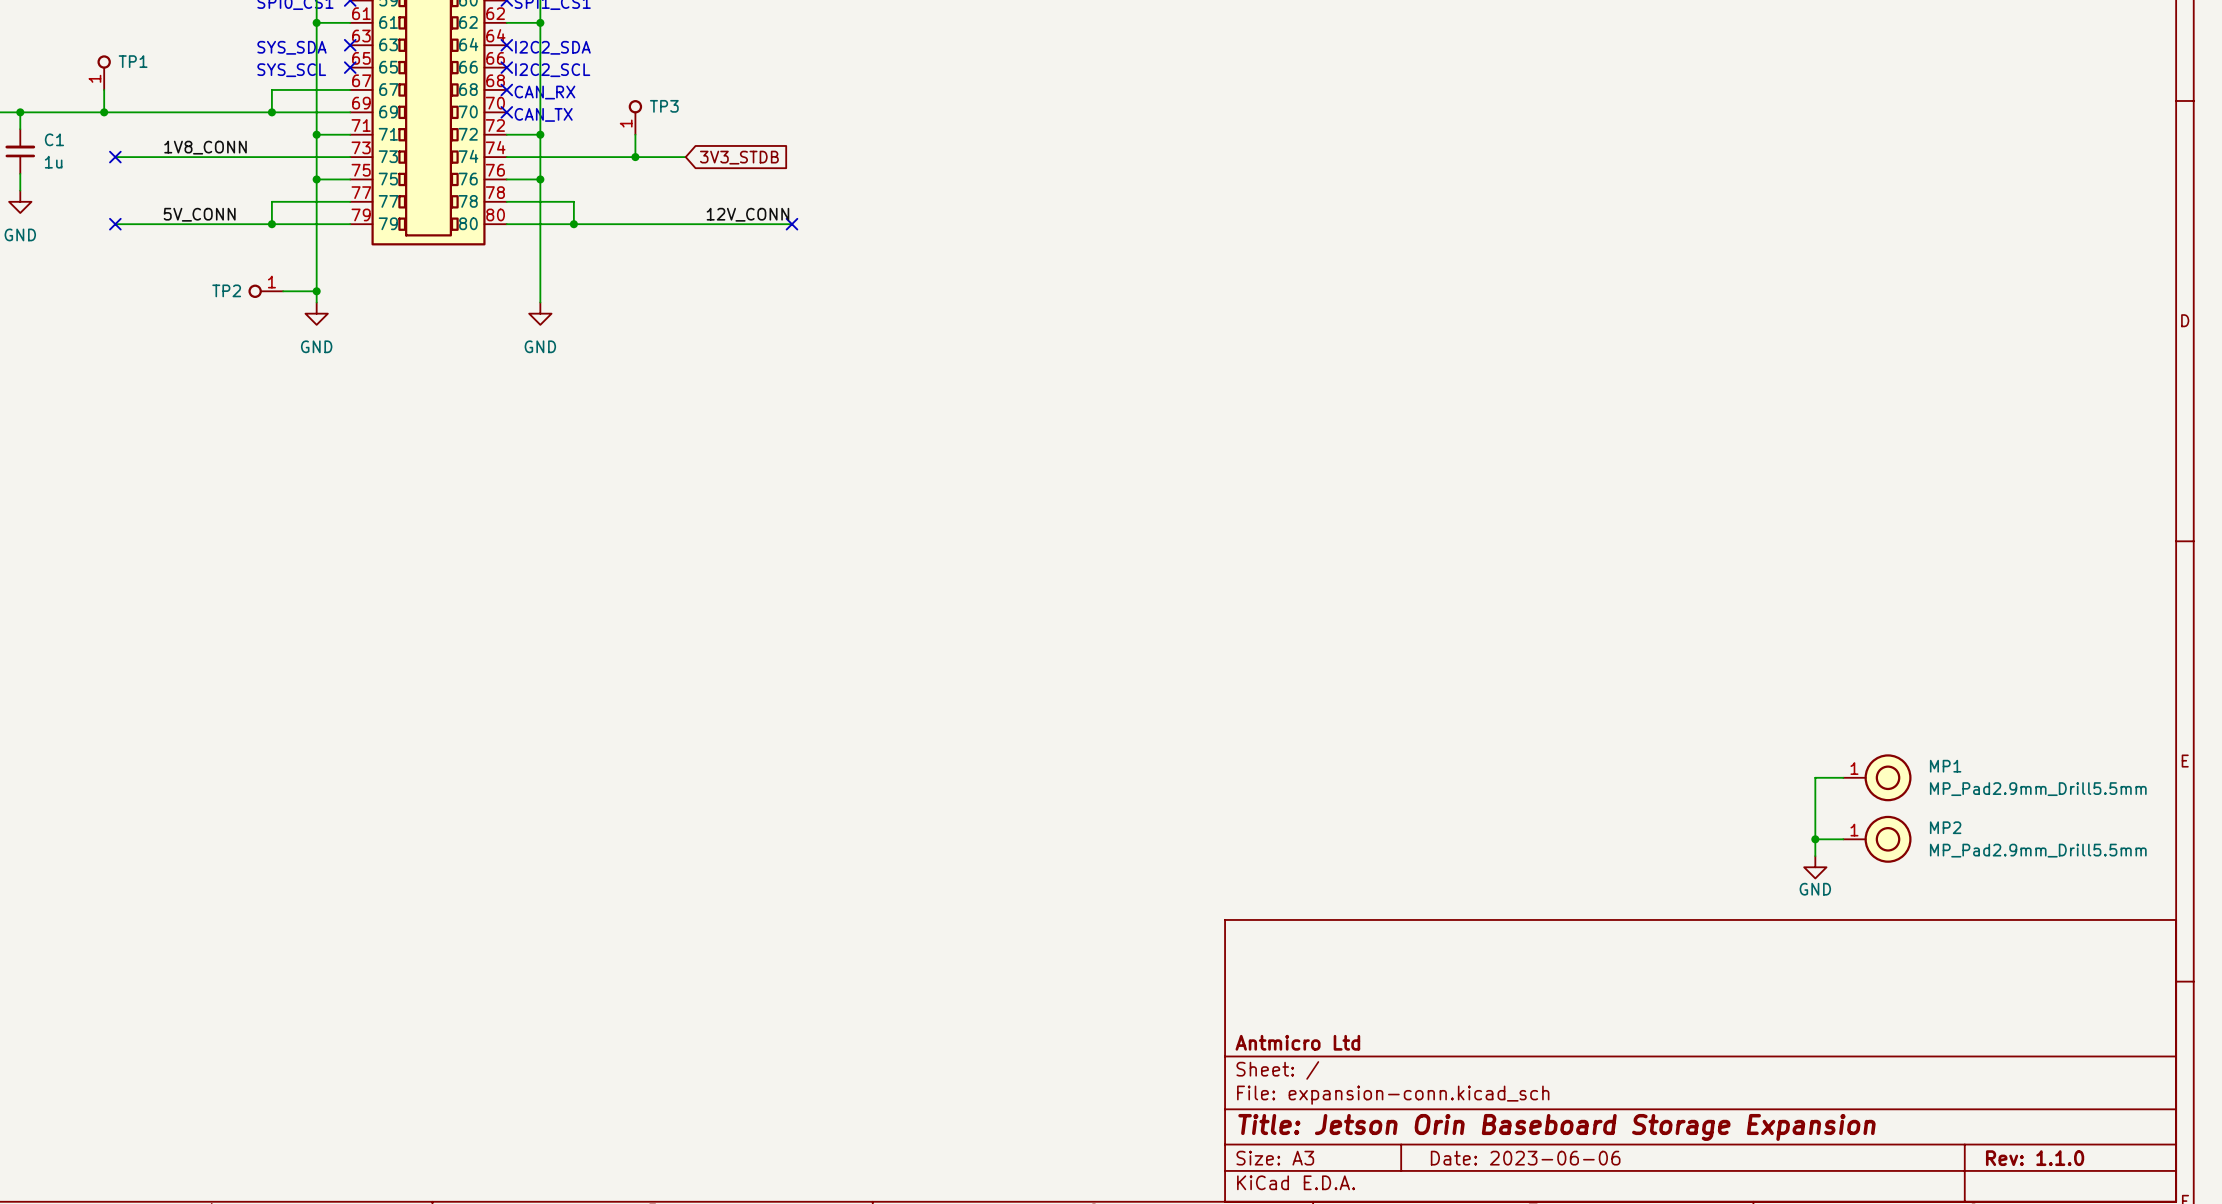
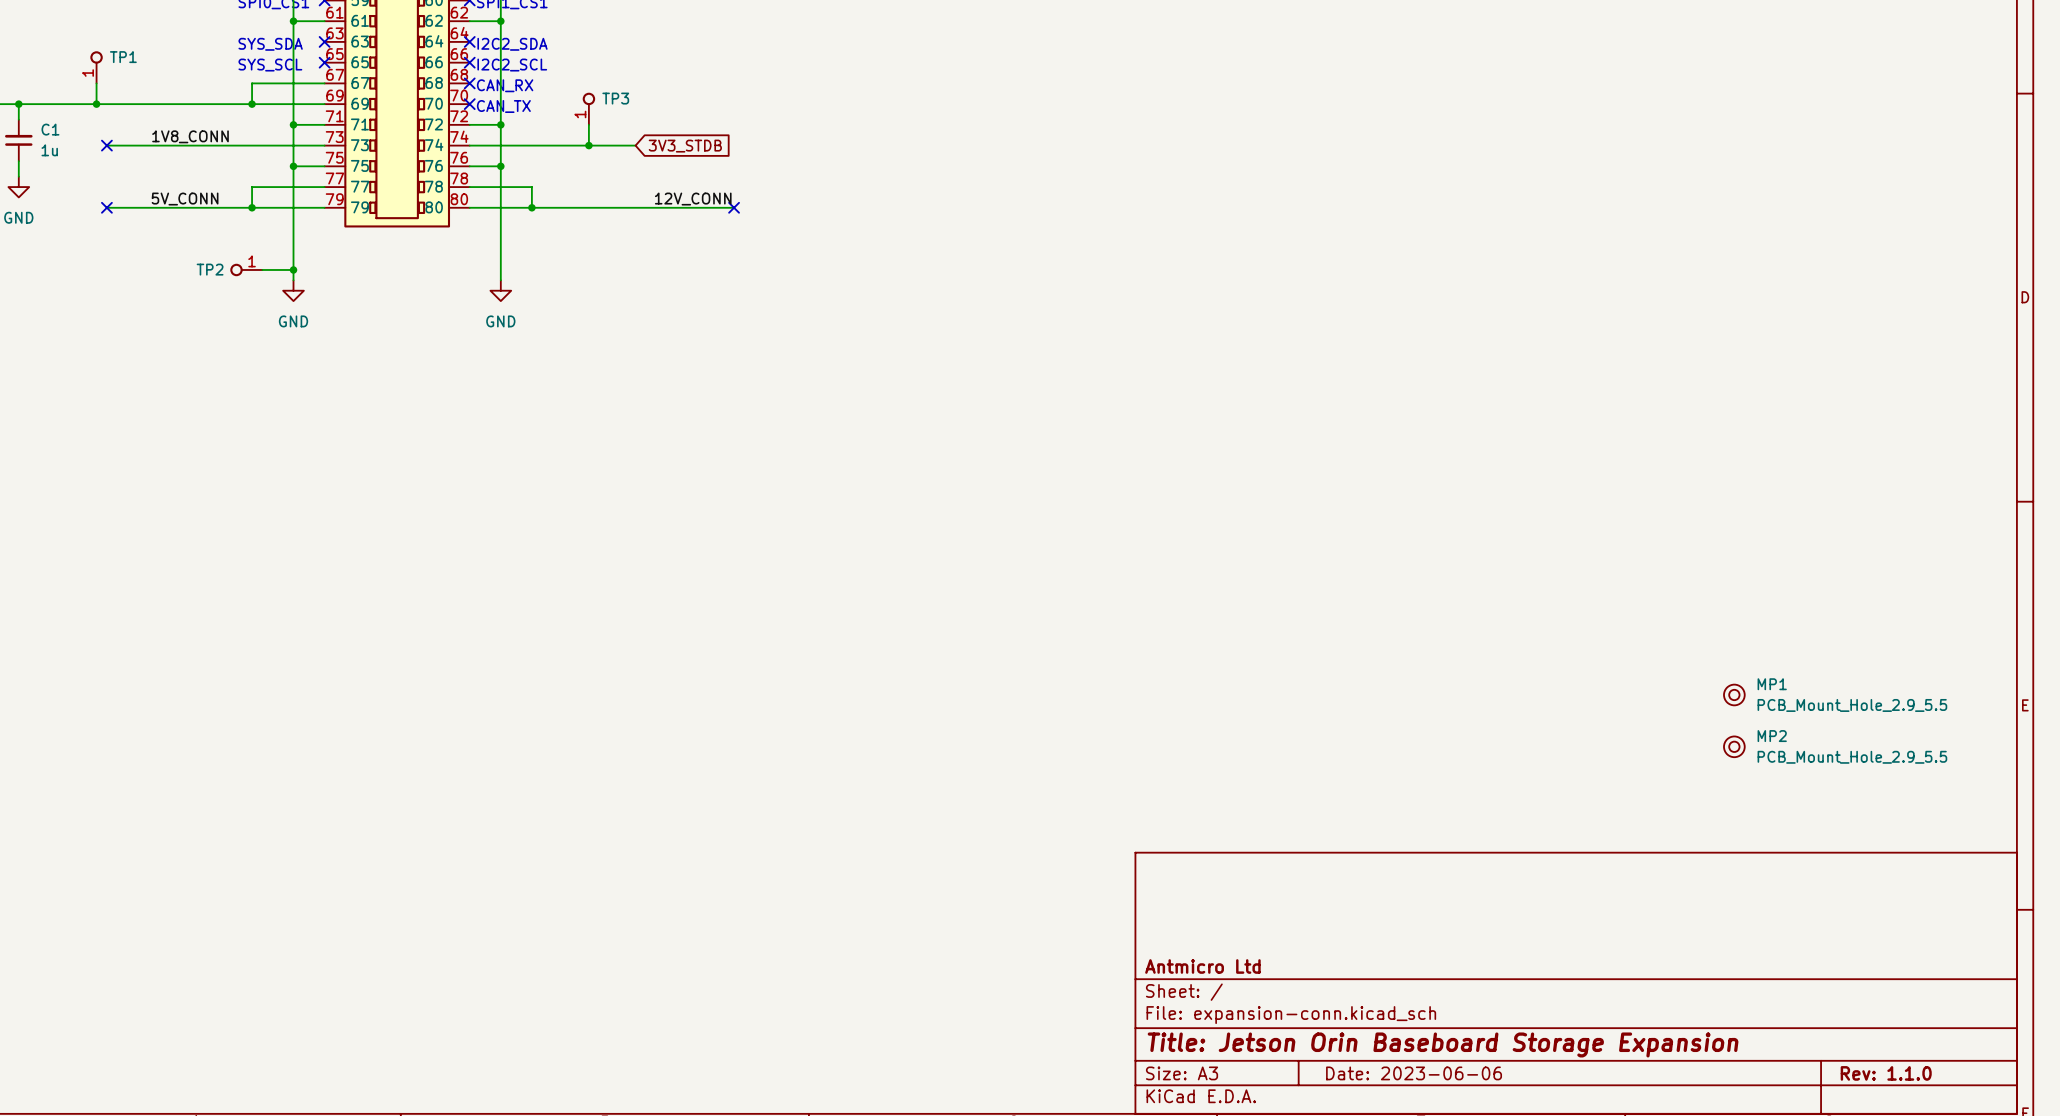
MP1 symbol: [1843, 754, 1912, 802] -> [1724, 684, 1745, 706]
MP1 name position: MP1 (1945, 766) -> MP1 (1772, 684)
wire: (1843, 777) (1815, 777) (1815, 856) -> none
MP1 value: MP_Pad2.9mm_Drill5.5mm (2038, 789) -> PCB_Mount_Hole_2.9_5.5 (1852, 705)
MP2 symbol: [1843, 815, 1912, 863] -> [1724, 736, 1745, 758]
MP2 name position: MP2 (1945, 827) -> MP2 (1772, 736)
wire: (1815, 839) (1843, 839) -> none
junction: (1815, 839) -> none
MP2 value: MP_Pad2.9mm_Drill5.5mm (2038, 850) -> PCB_Mount_Hole_2.9_5.5 (1852, 757)
power symbol: GND (1815, 867) -> none

